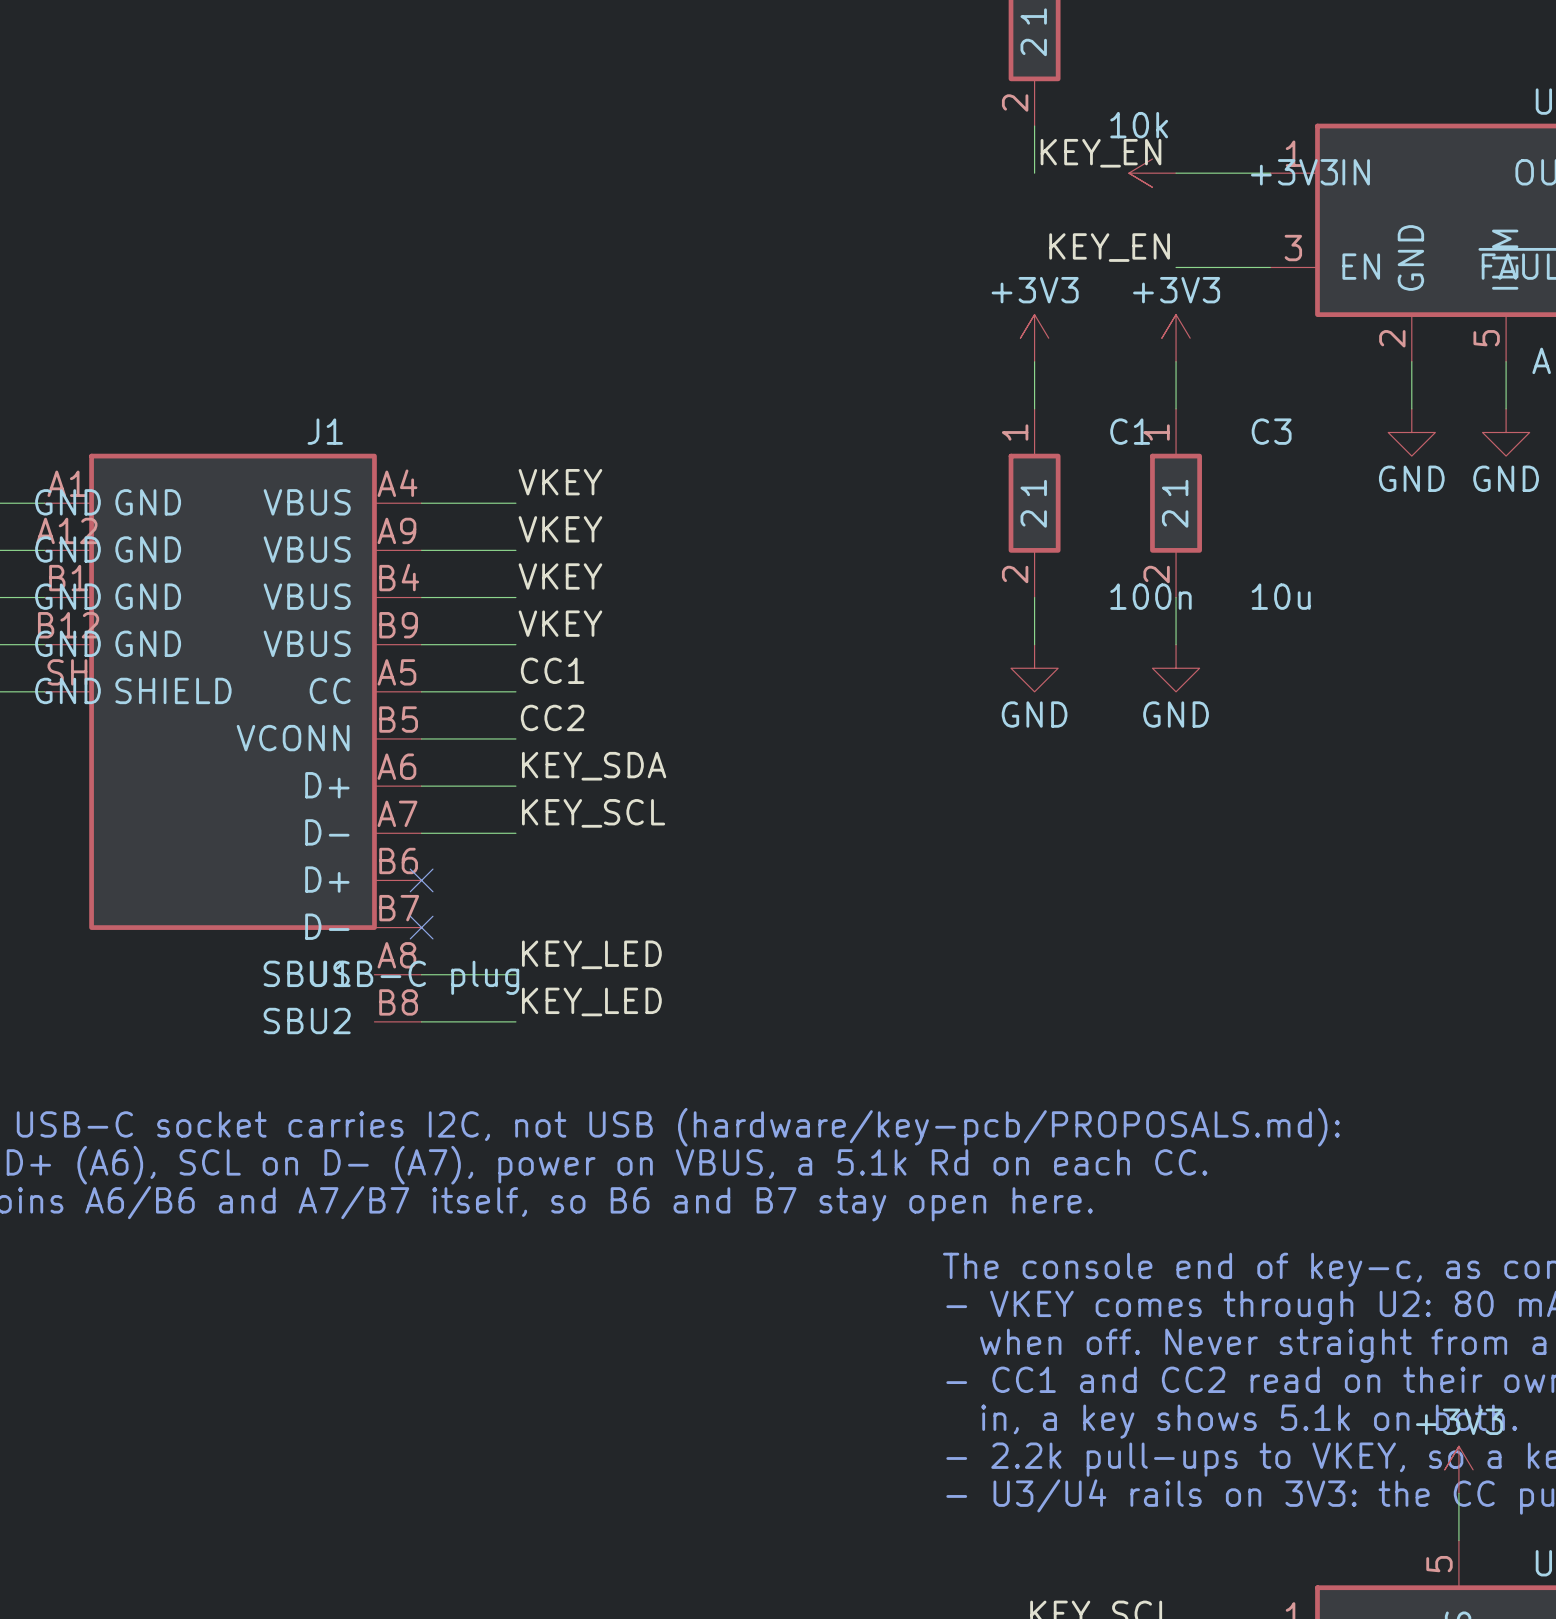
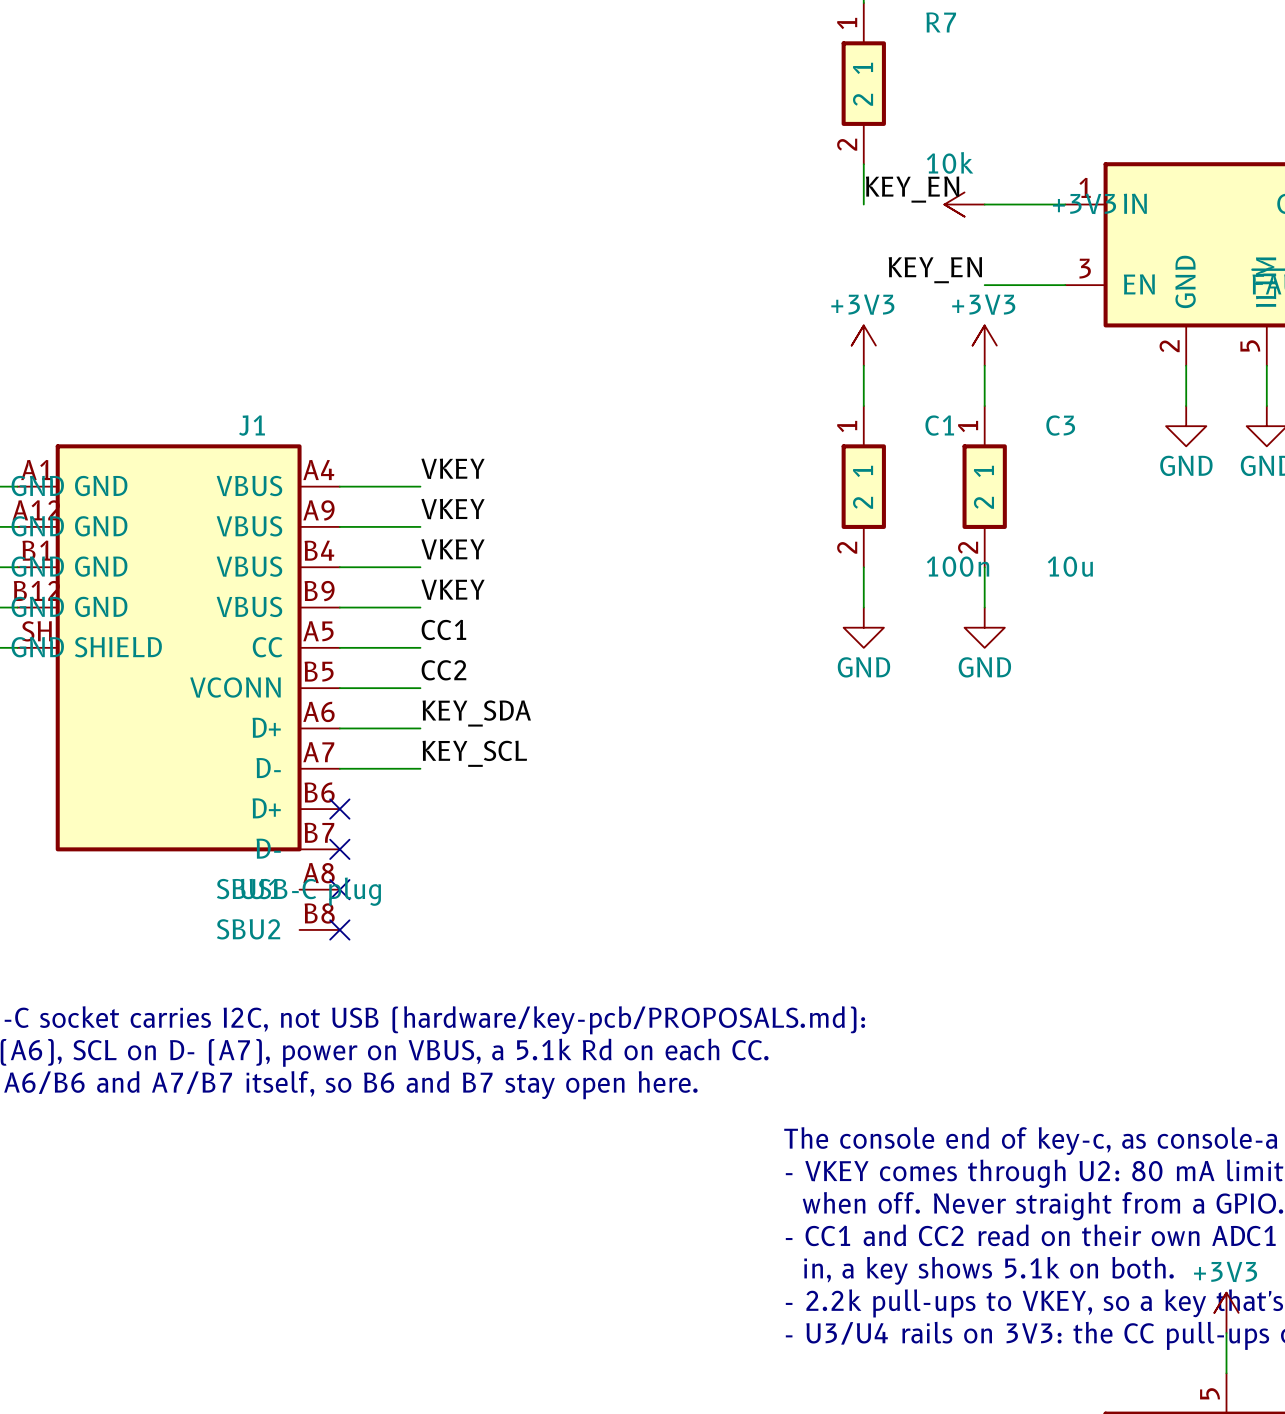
label: KEY_LED (591, 954) -> none
wire: (421, 974) (515, 974) -> none
no-connect mark: none -> (339, 889)
label: KEY_LED (591, 1001) -> none
wire: (421, 1021) (515, 1021) -> none
no-connect mark: none -> (339, 929)

